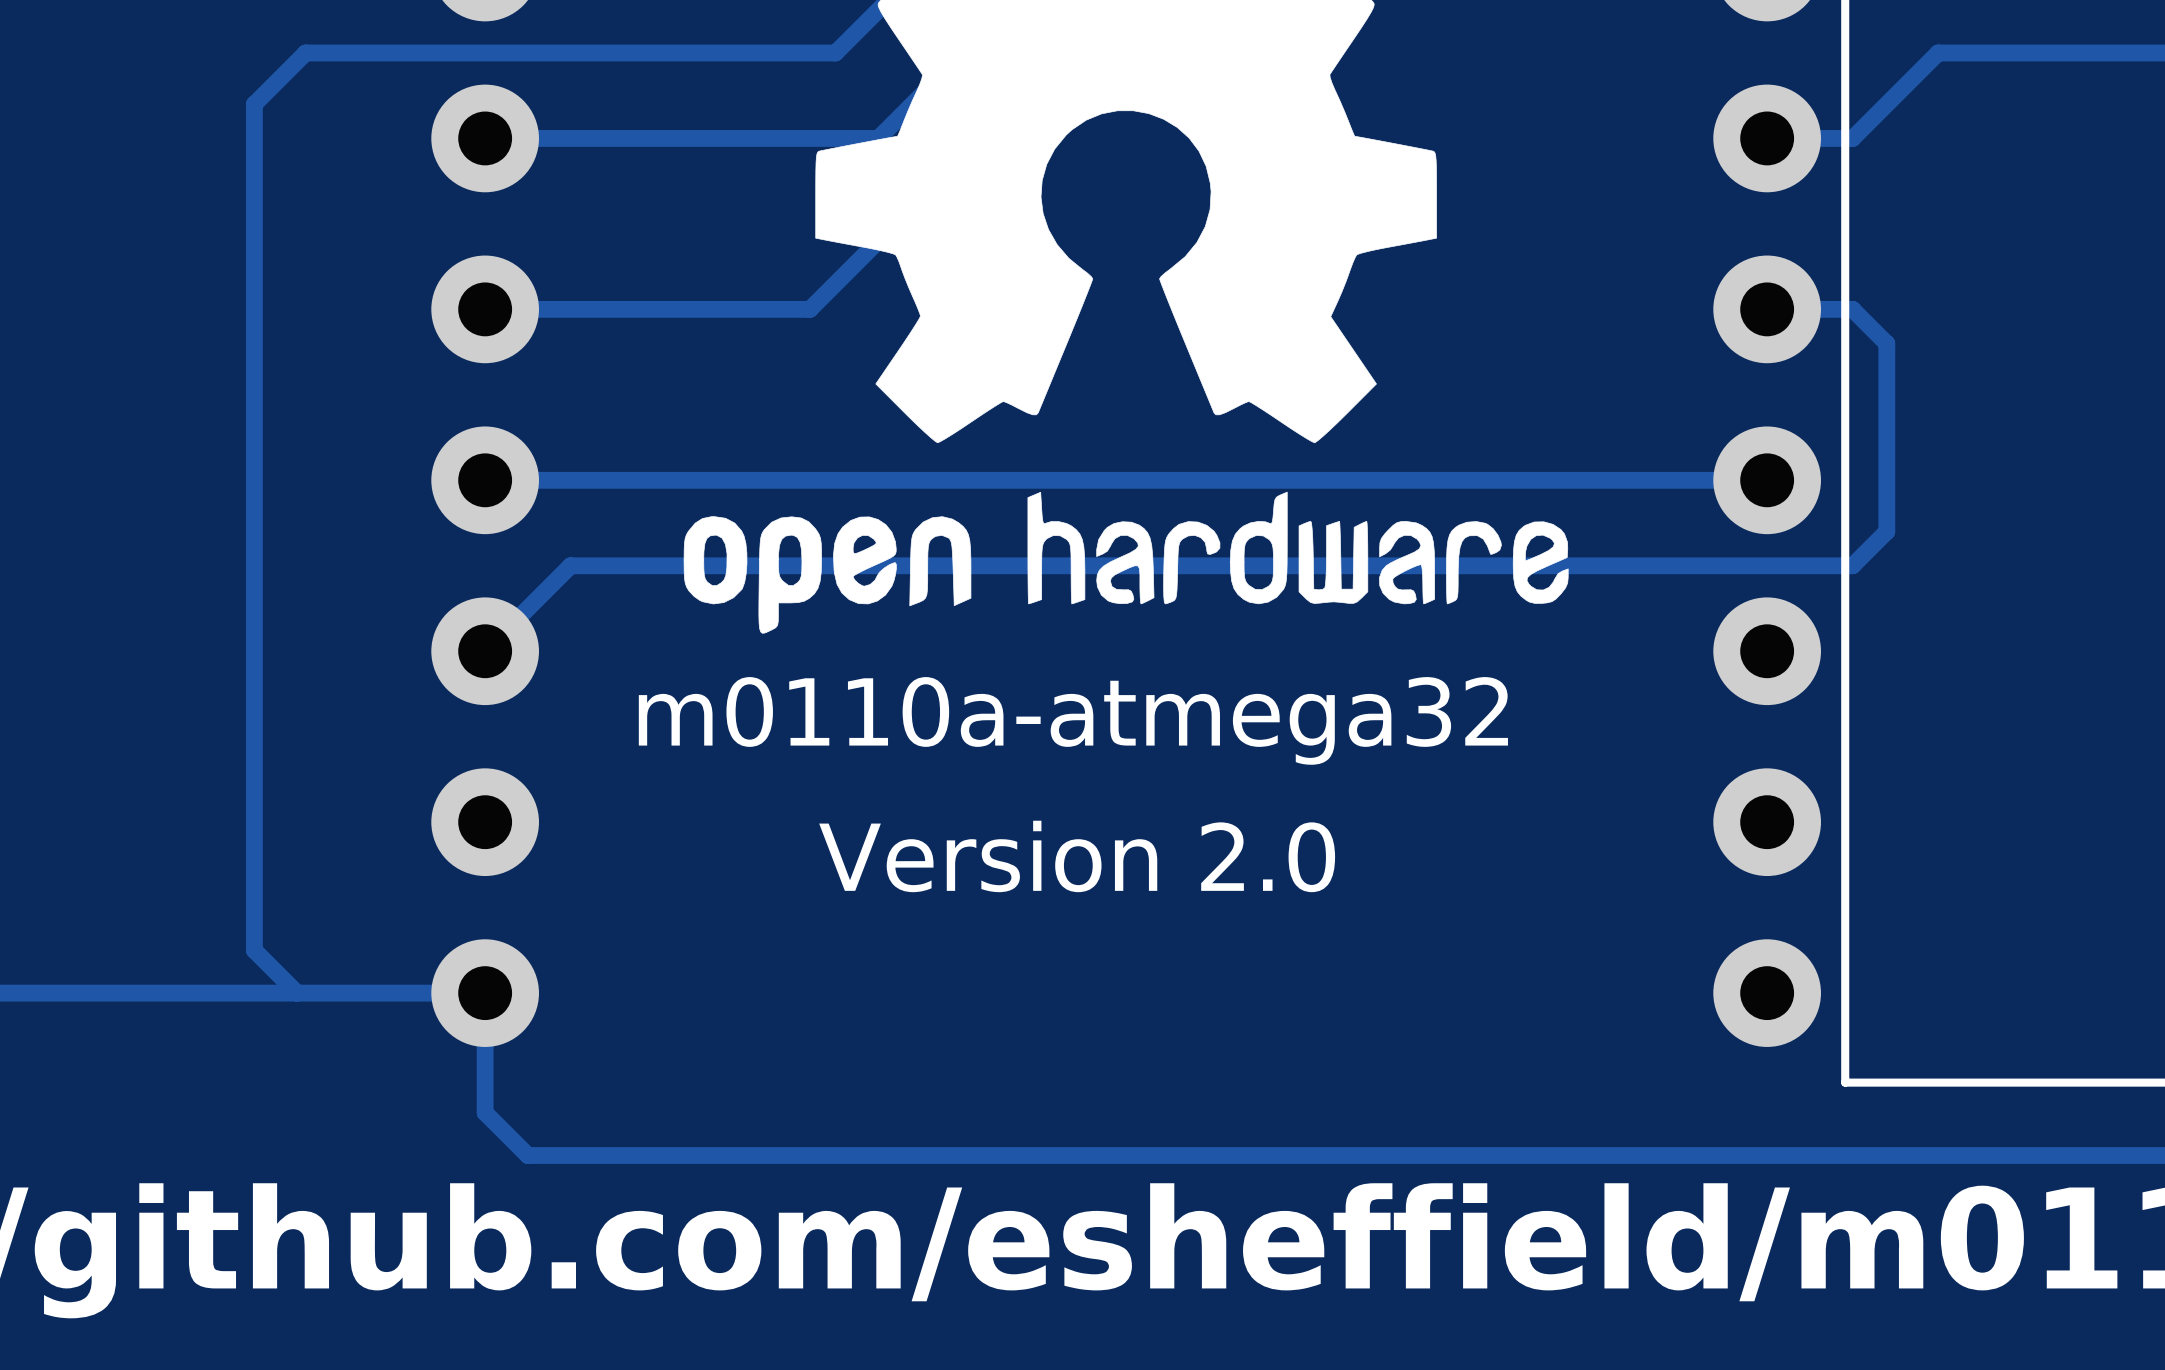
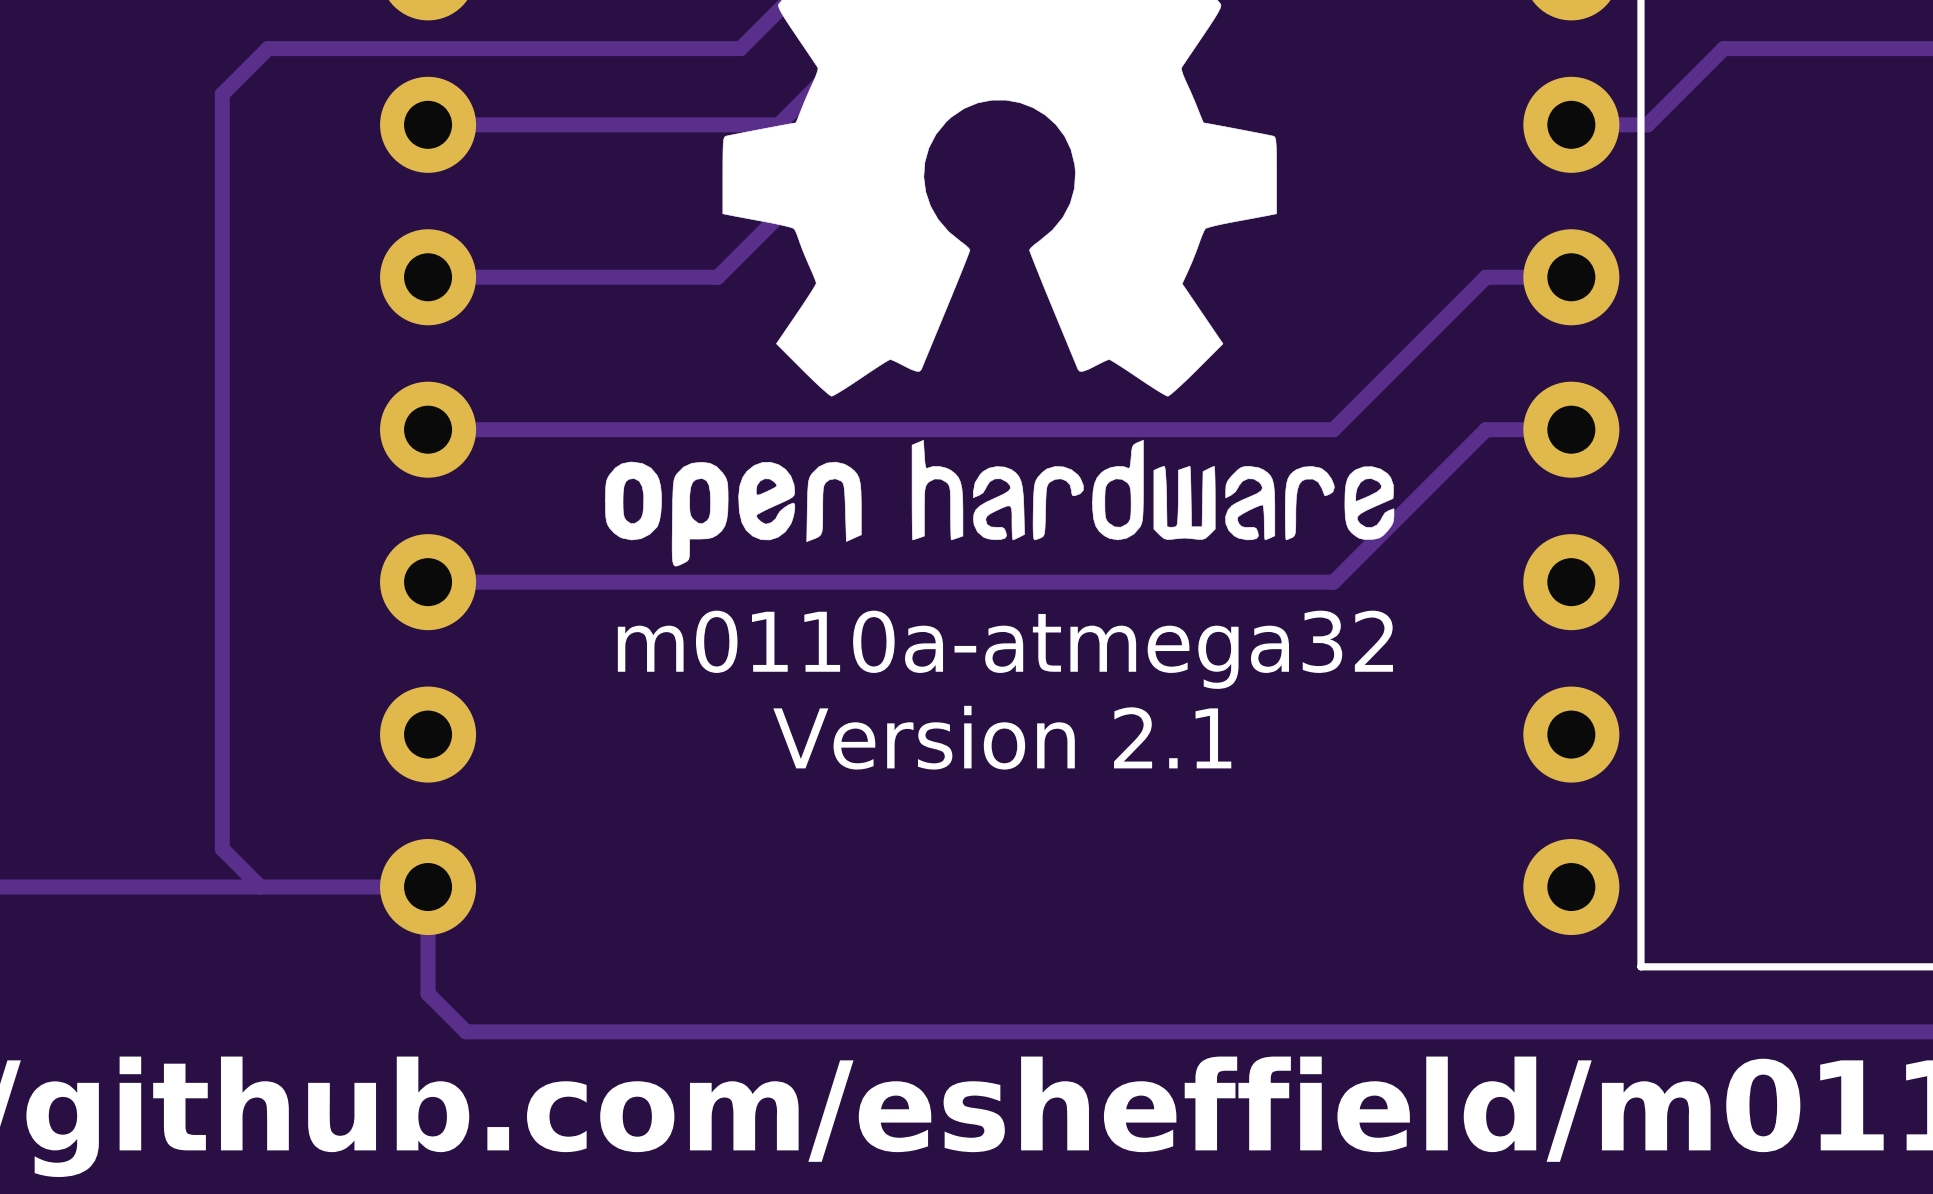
track: (1767, 309) (1852, 309) (1886, 343) (1886, 531) (1852, 565) (570, 565) (485, 651) -> (1485, 429) (1333, 582) (428, 582)
track: (1500, 480) (1671, 480) -> (1333, 429) (1485, 277) (1571, 277)
text position: m0110a-atmega32 (1073, 720) -> m0110a-atmega32 (1005, 649)
text: Version 2.0 (1077, 856) -> Version 2.1 (1002, 737)

